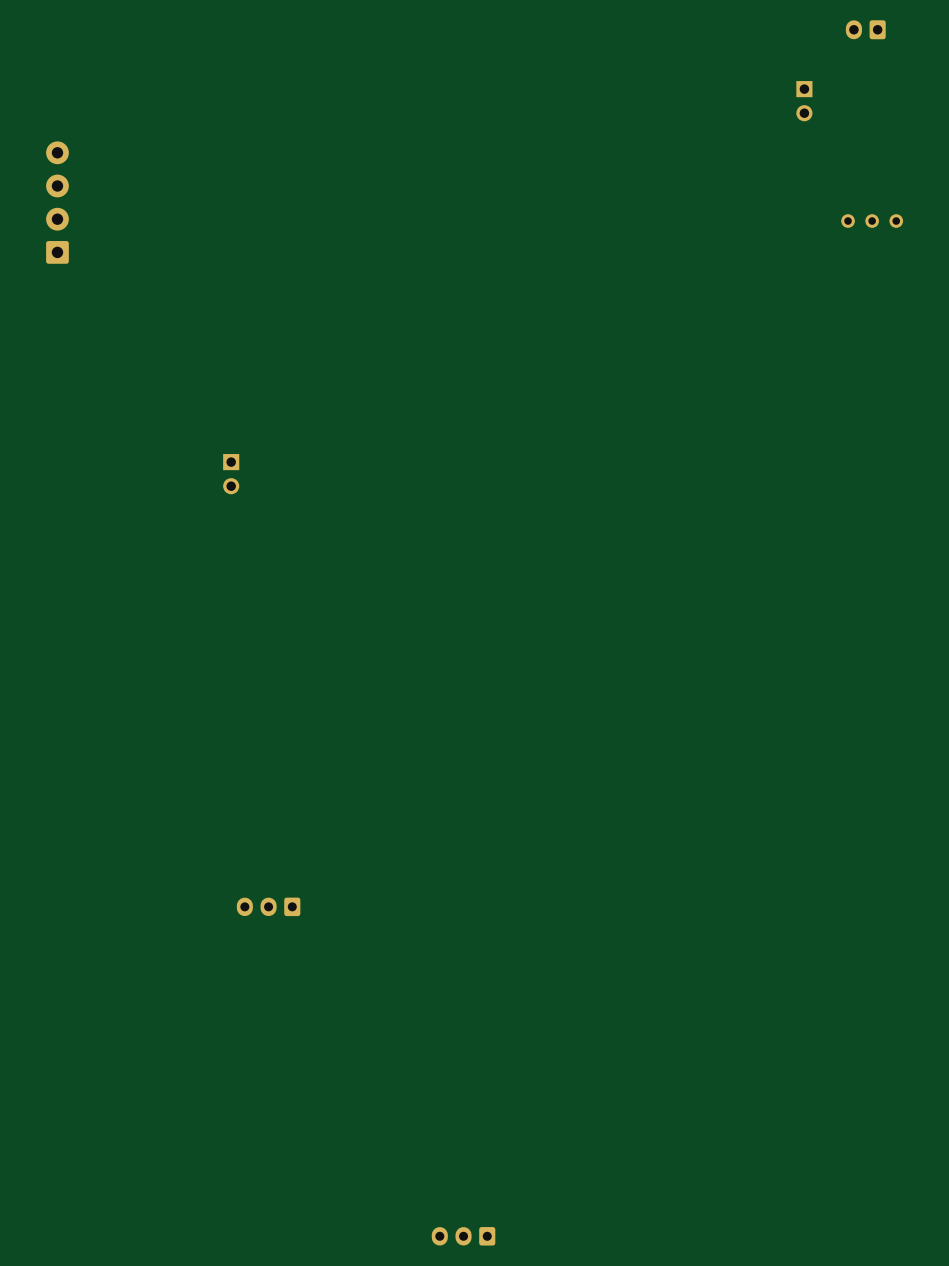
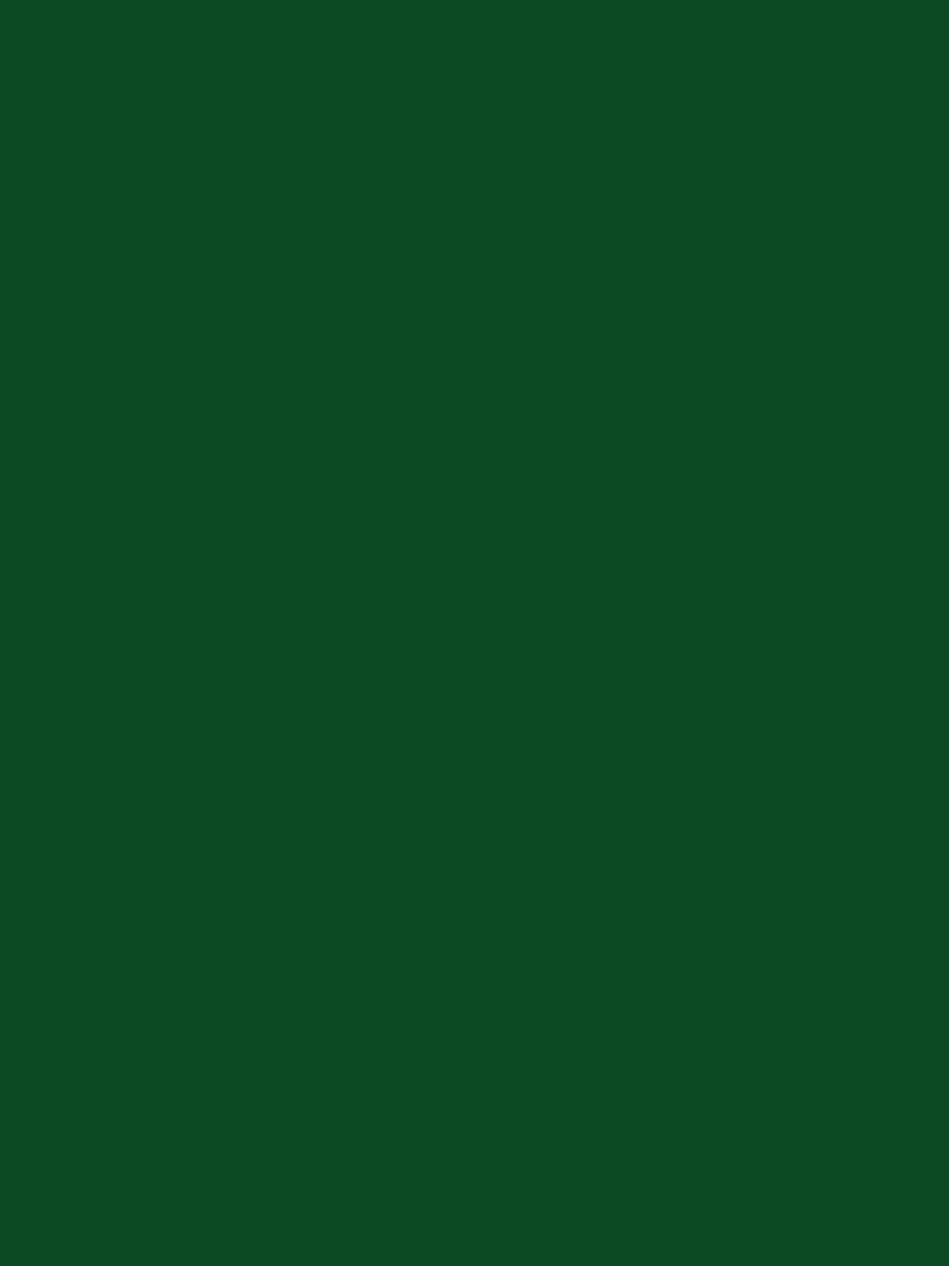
part: (865, 29) -> none
part: (804, 101) -> none
part: (57, 202) -> none
part: (872, 221) -> none
part: (231, 474) -> none
part: (268, 906) -> none
part: (463, 1236) -> none

